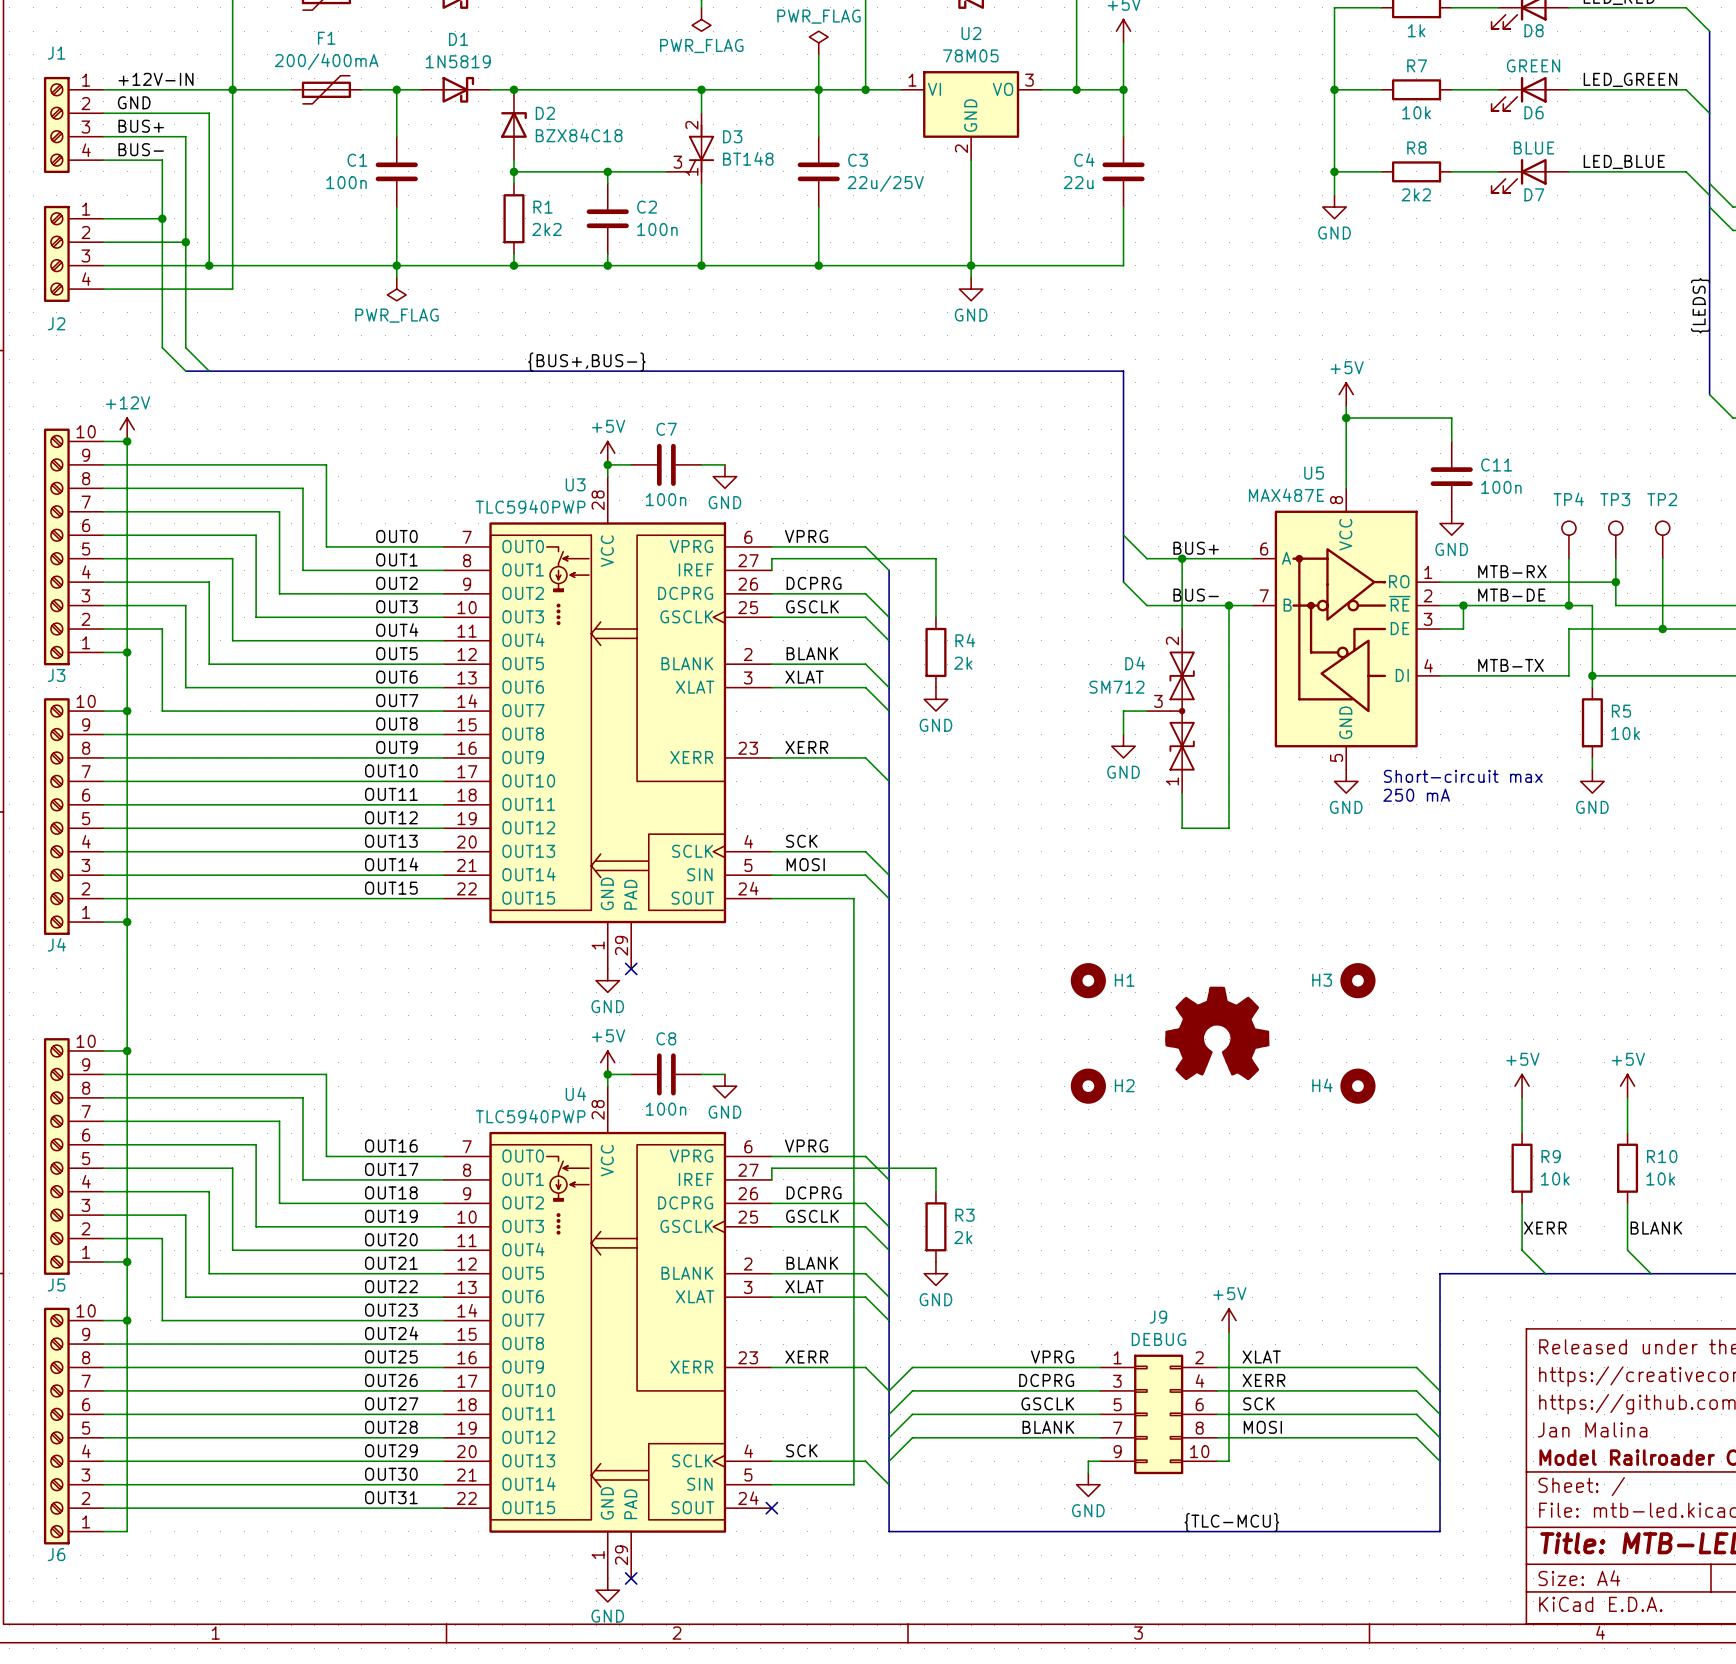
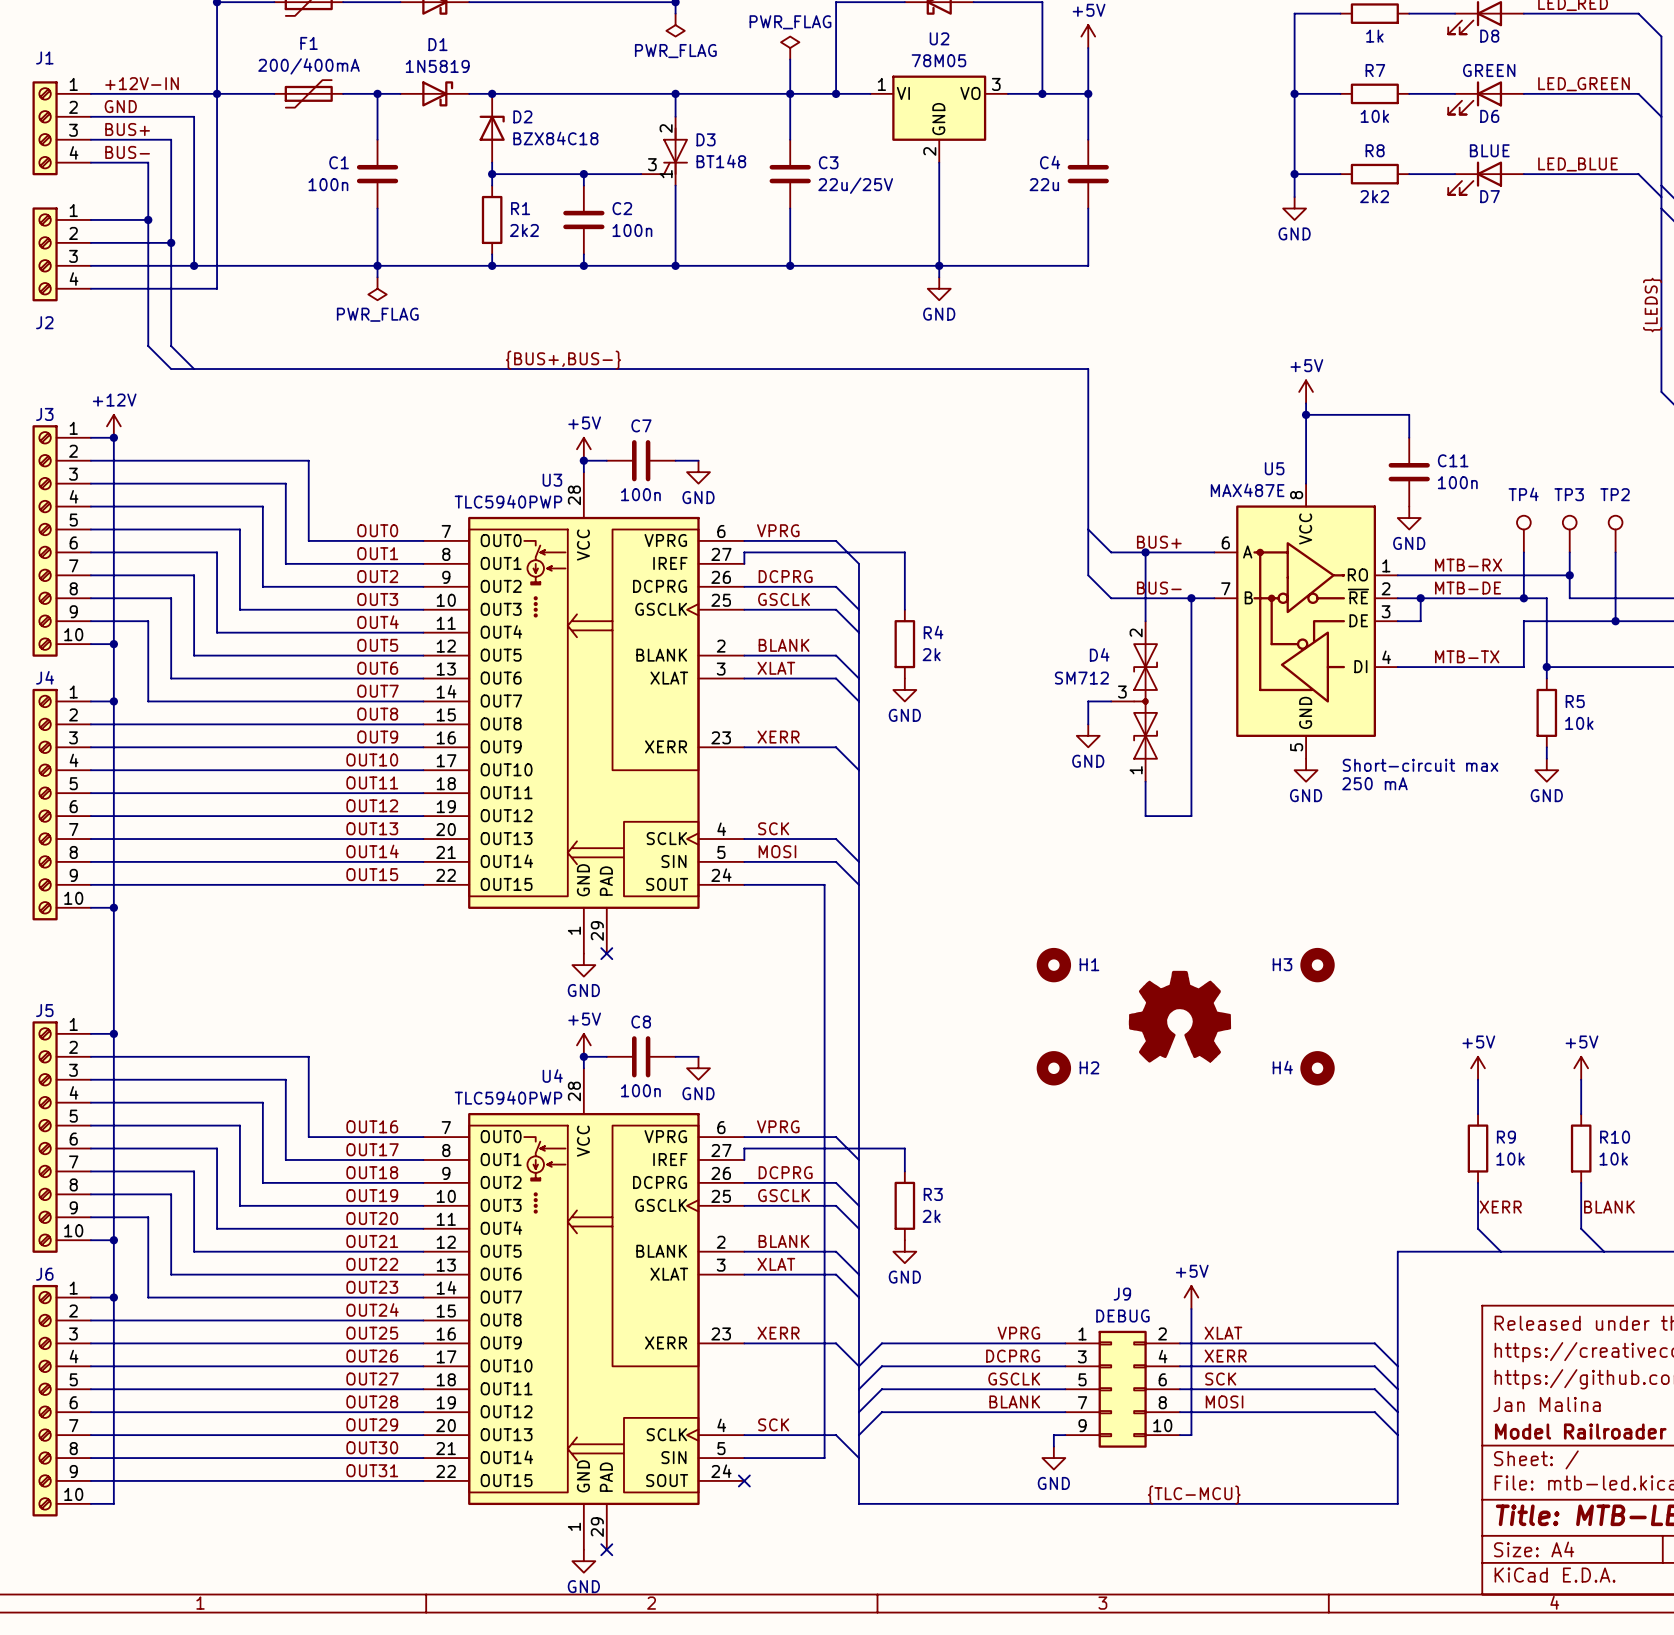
J3 flip: as is (56, 546) -> up-down (45, 540)
J4 flip: as is (56, 816) -> up-down (45, 804)
J5 flip: as is (56, 1156) -> up-down (45, 1137)
J6 flip: as is (56, 1426) -> up-down (45, 1400)

